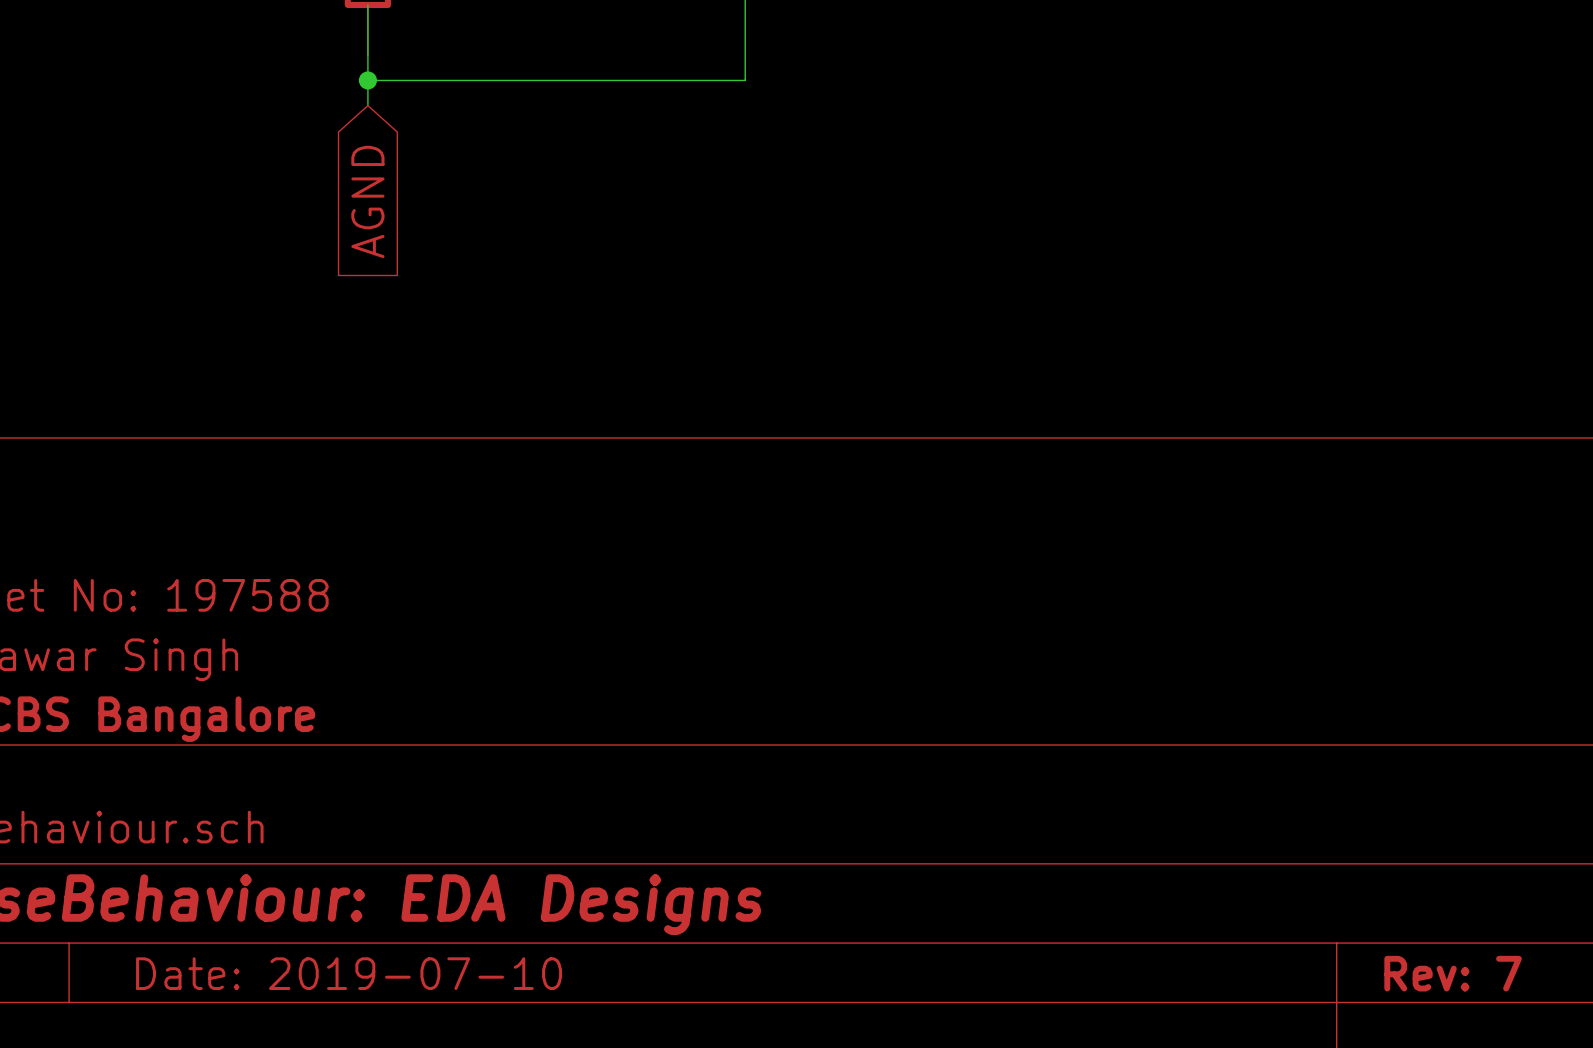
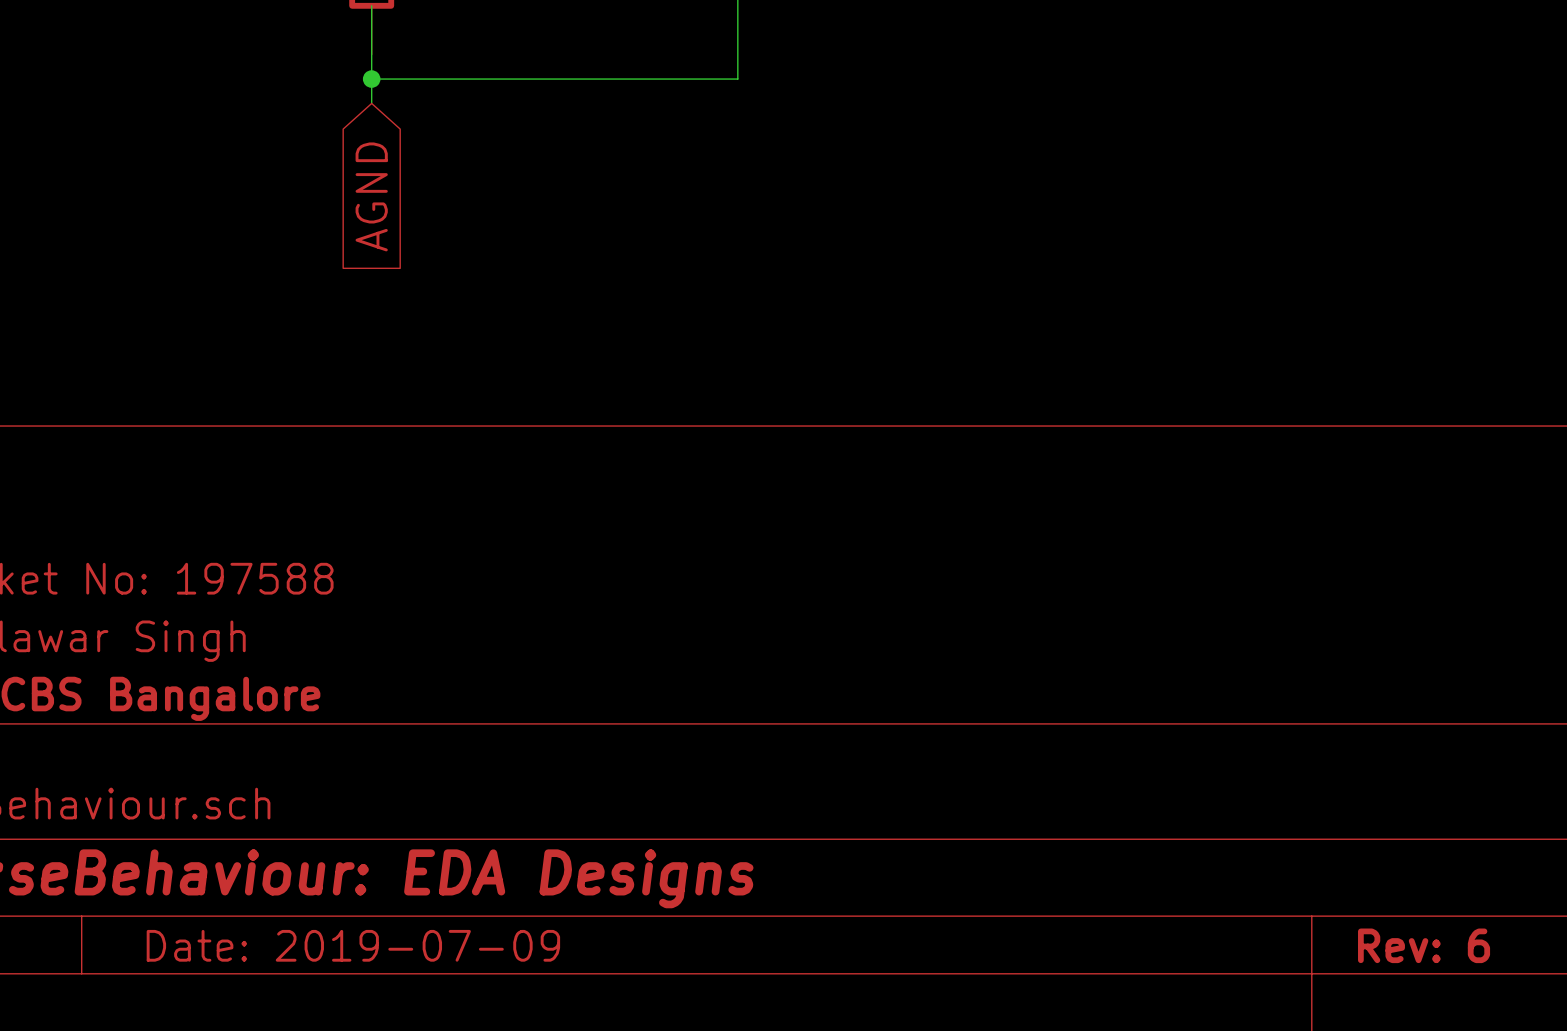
title block: Date: 2019-07-10 (349, 973) -> Date: 2019-07-09 (353, 945)
title block: Rev: 7 (1453, 973) -> Rev: 6 (1424, 945)

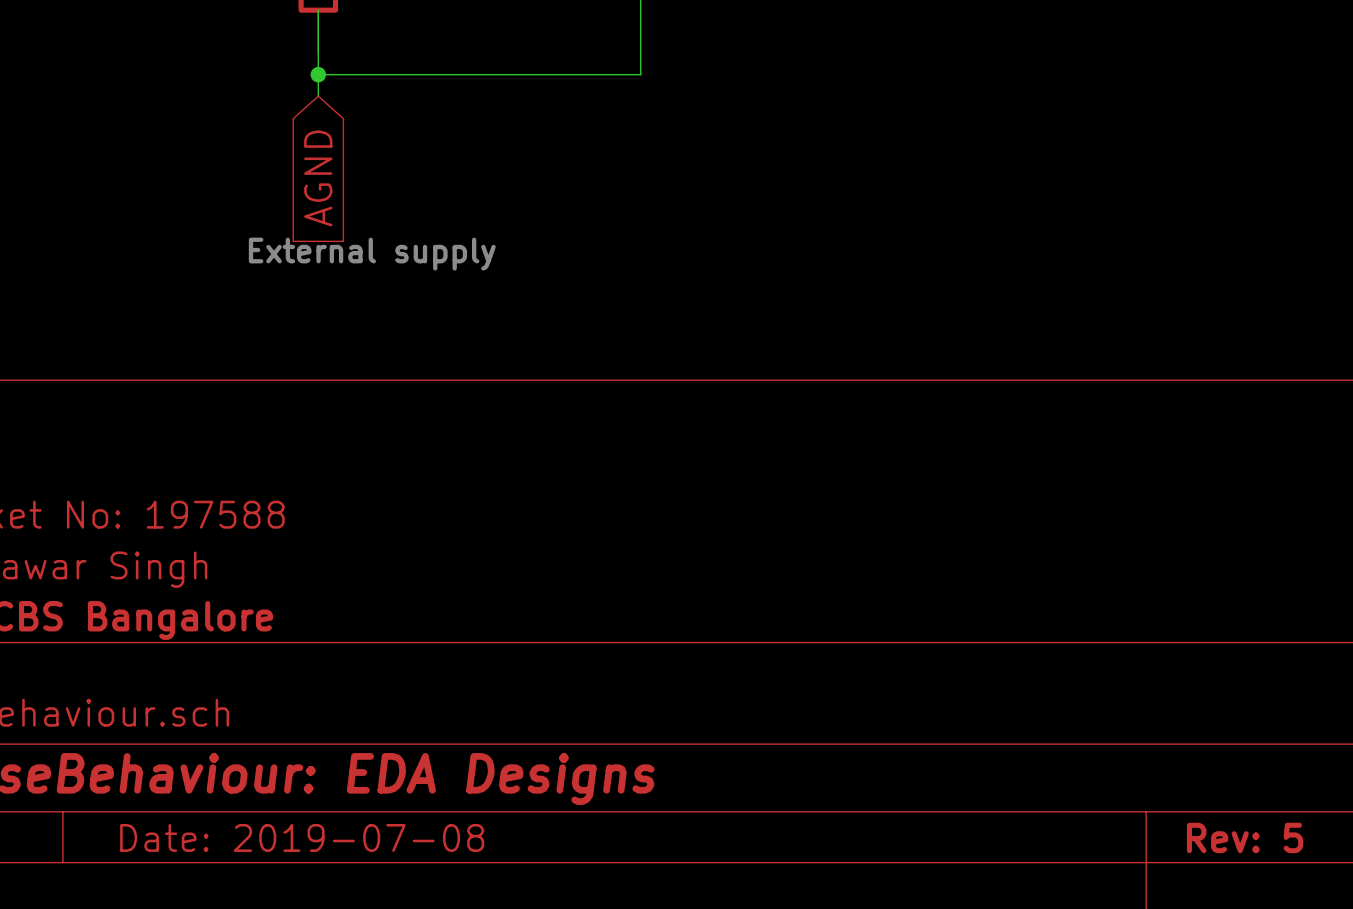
text: none -> External supply (372, 254)
title block: Date: 2019-07-09 (353, 945) -> Date: 2019-07-08 (302, 837)
title block: Rev: 6 (1424, 945) -> Rev: 5 (1245, 837)

